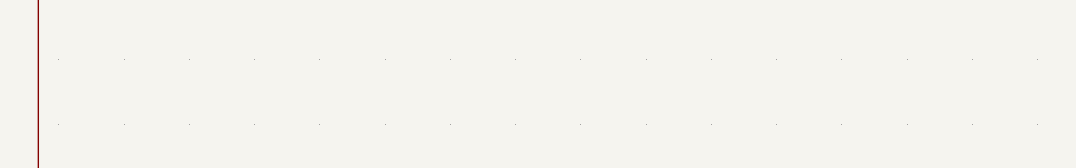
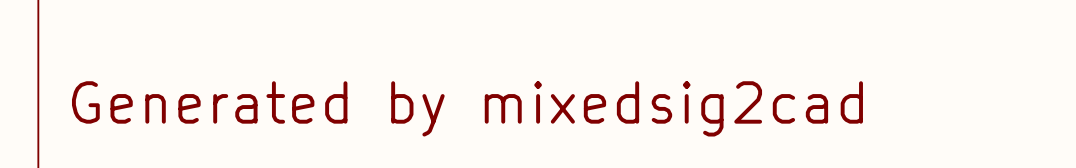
title block: none -> Generated by mixedsig2cad (467, 108)

